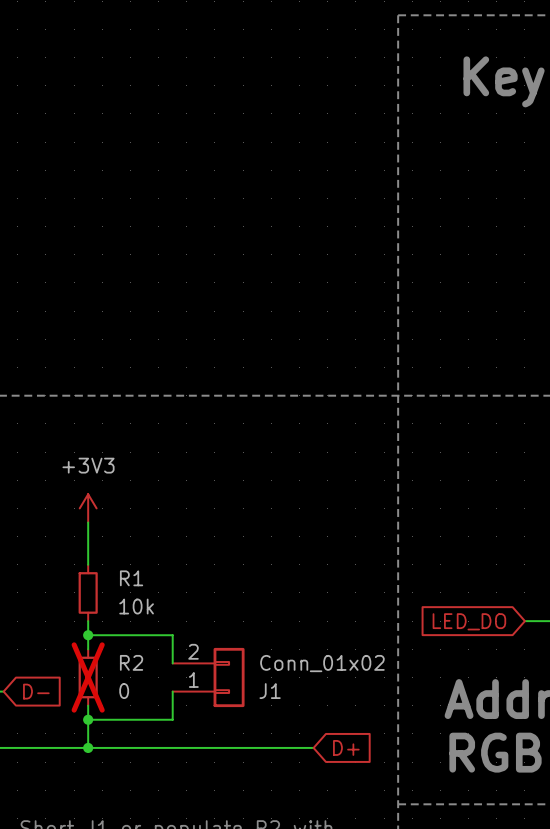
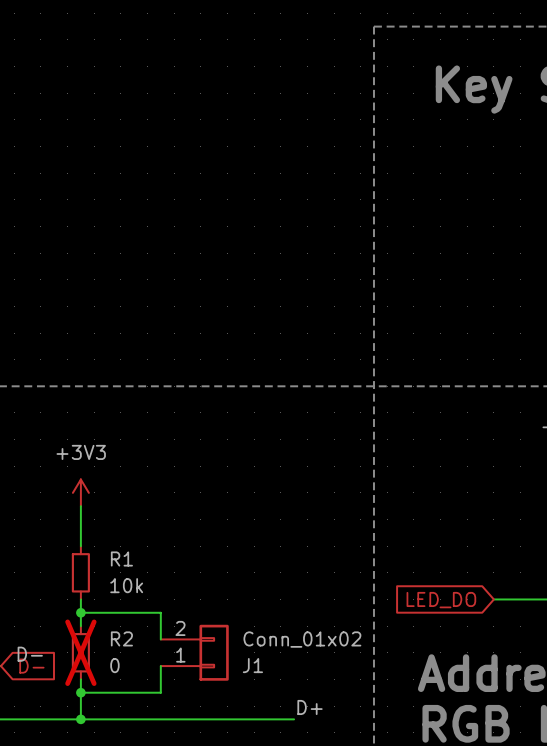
label: none -> D- (30, 654)
label: none -> D+ (310, 707)
global label: D+ (346, 747) -> none

